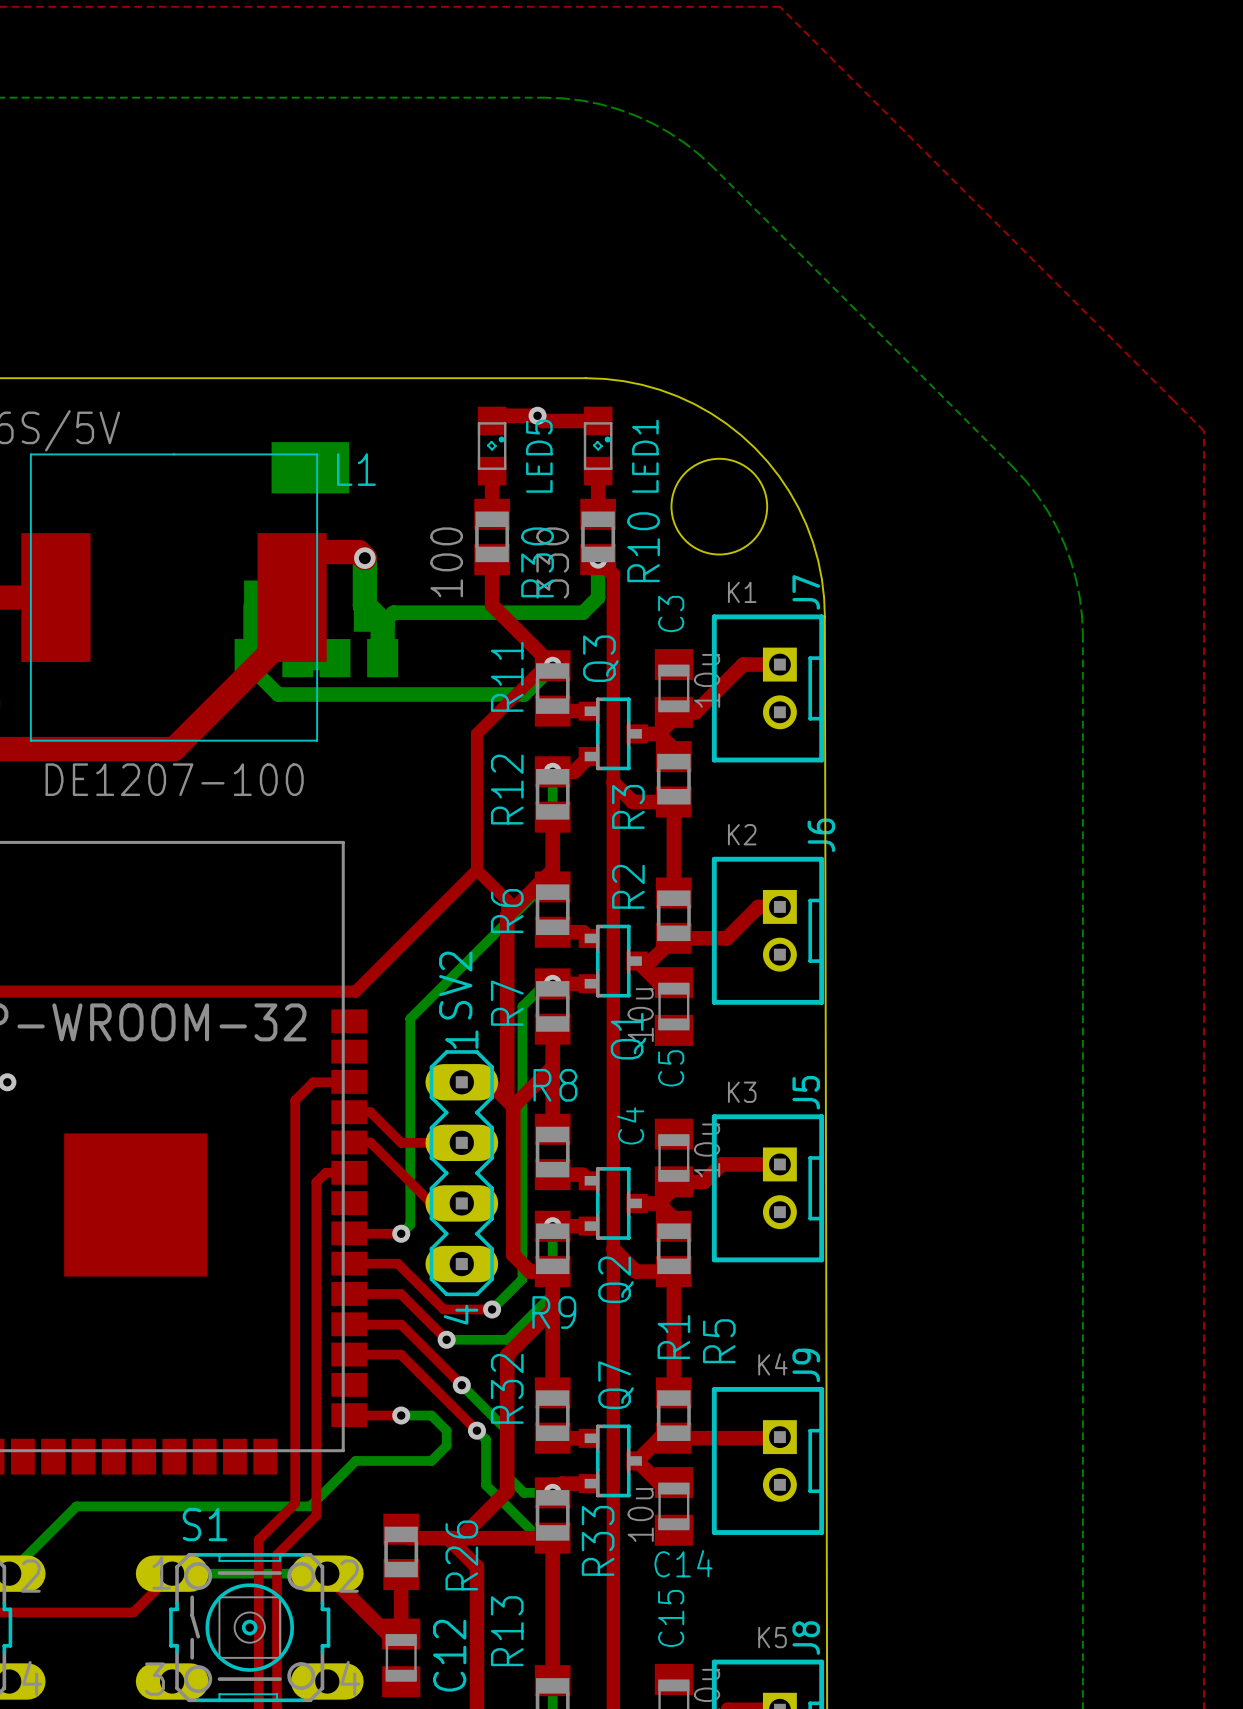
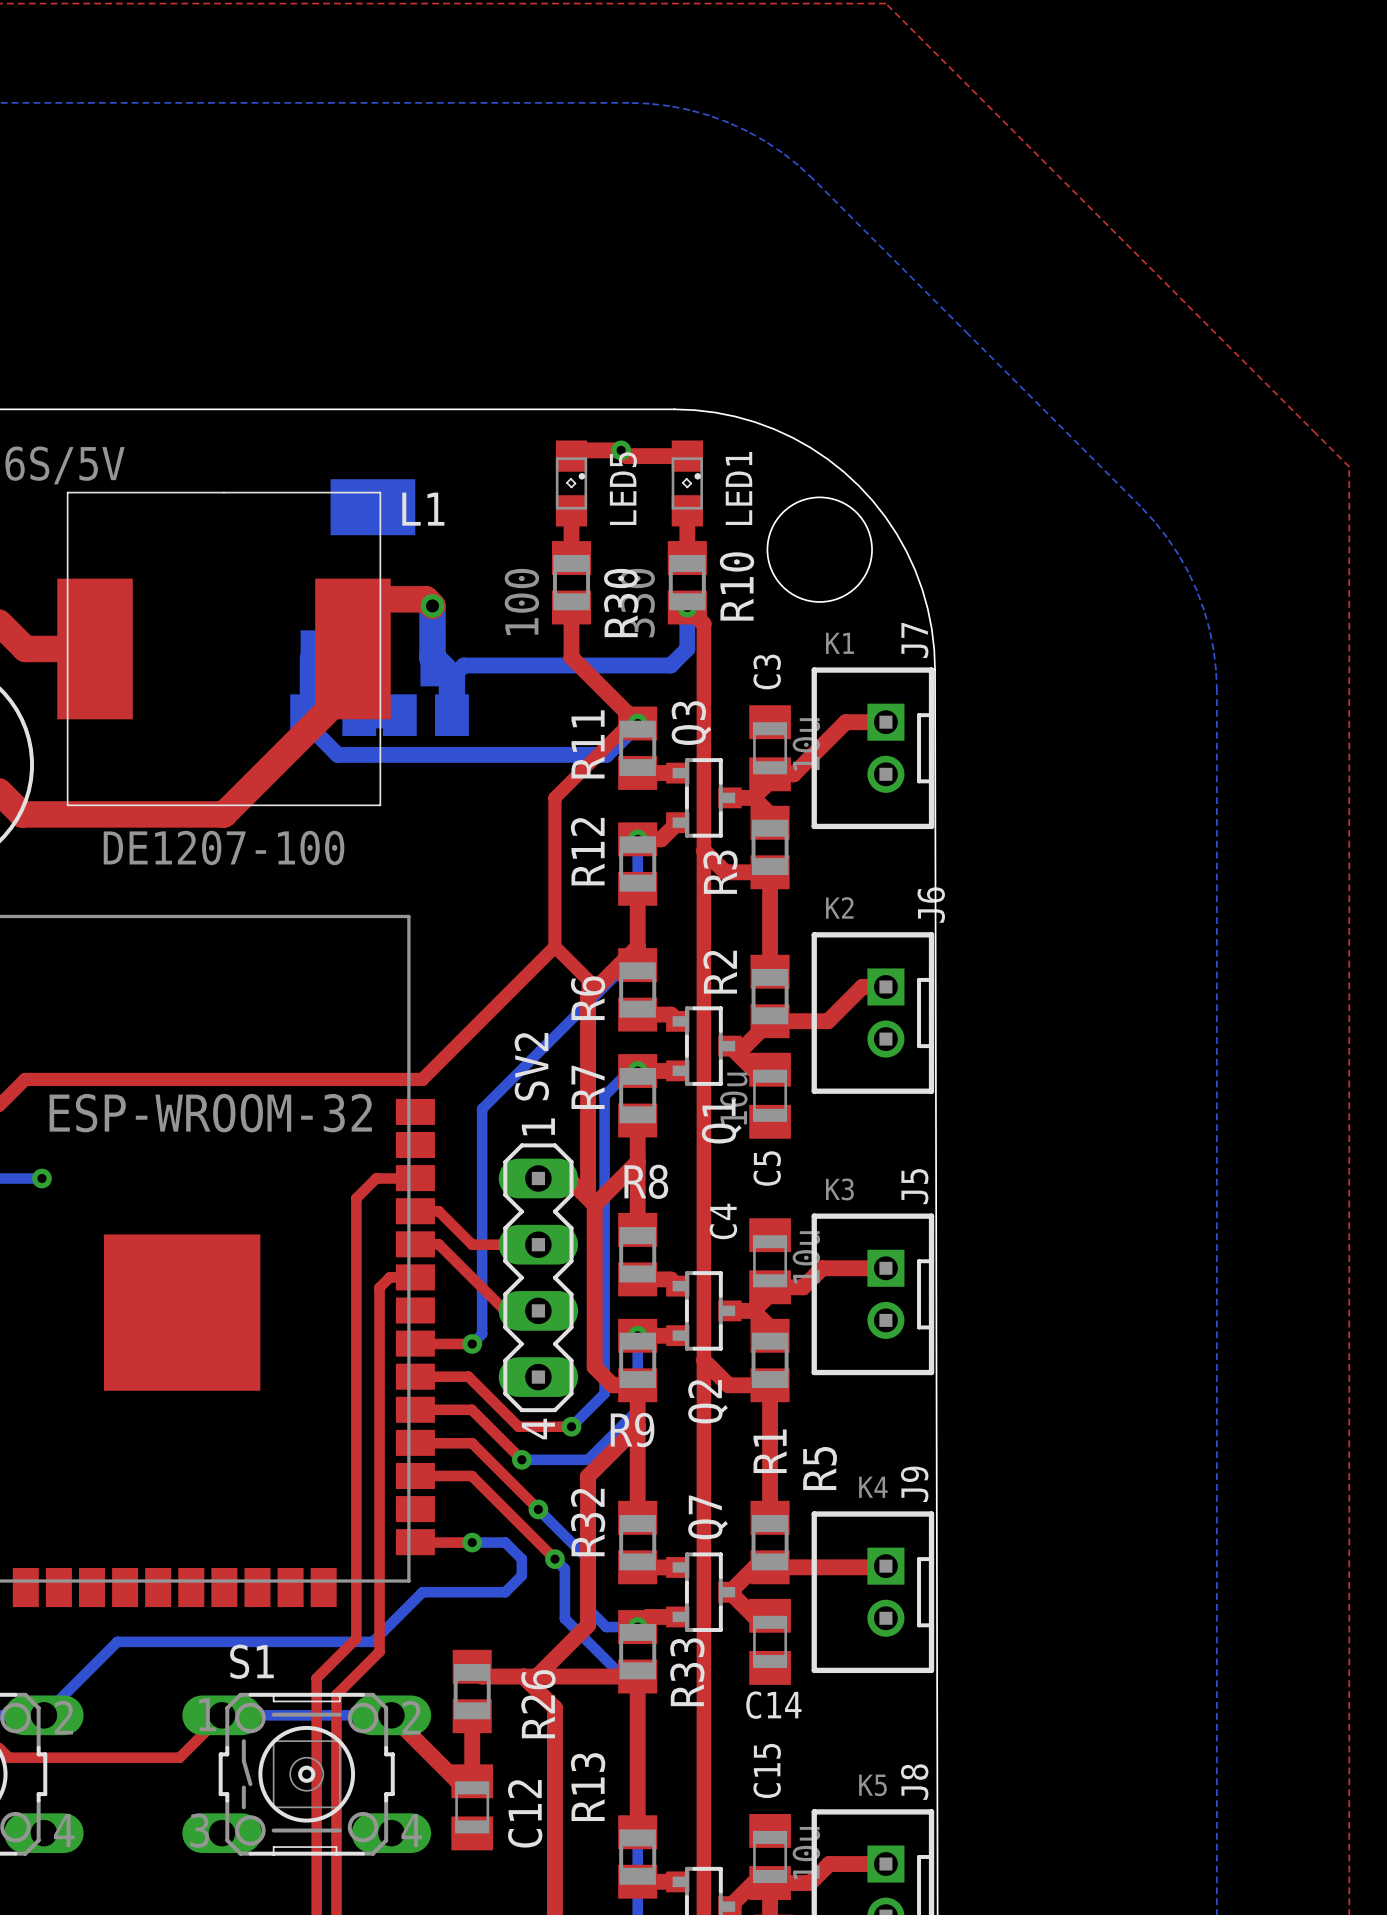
C14 value: 10u (640, 1514) -> none

